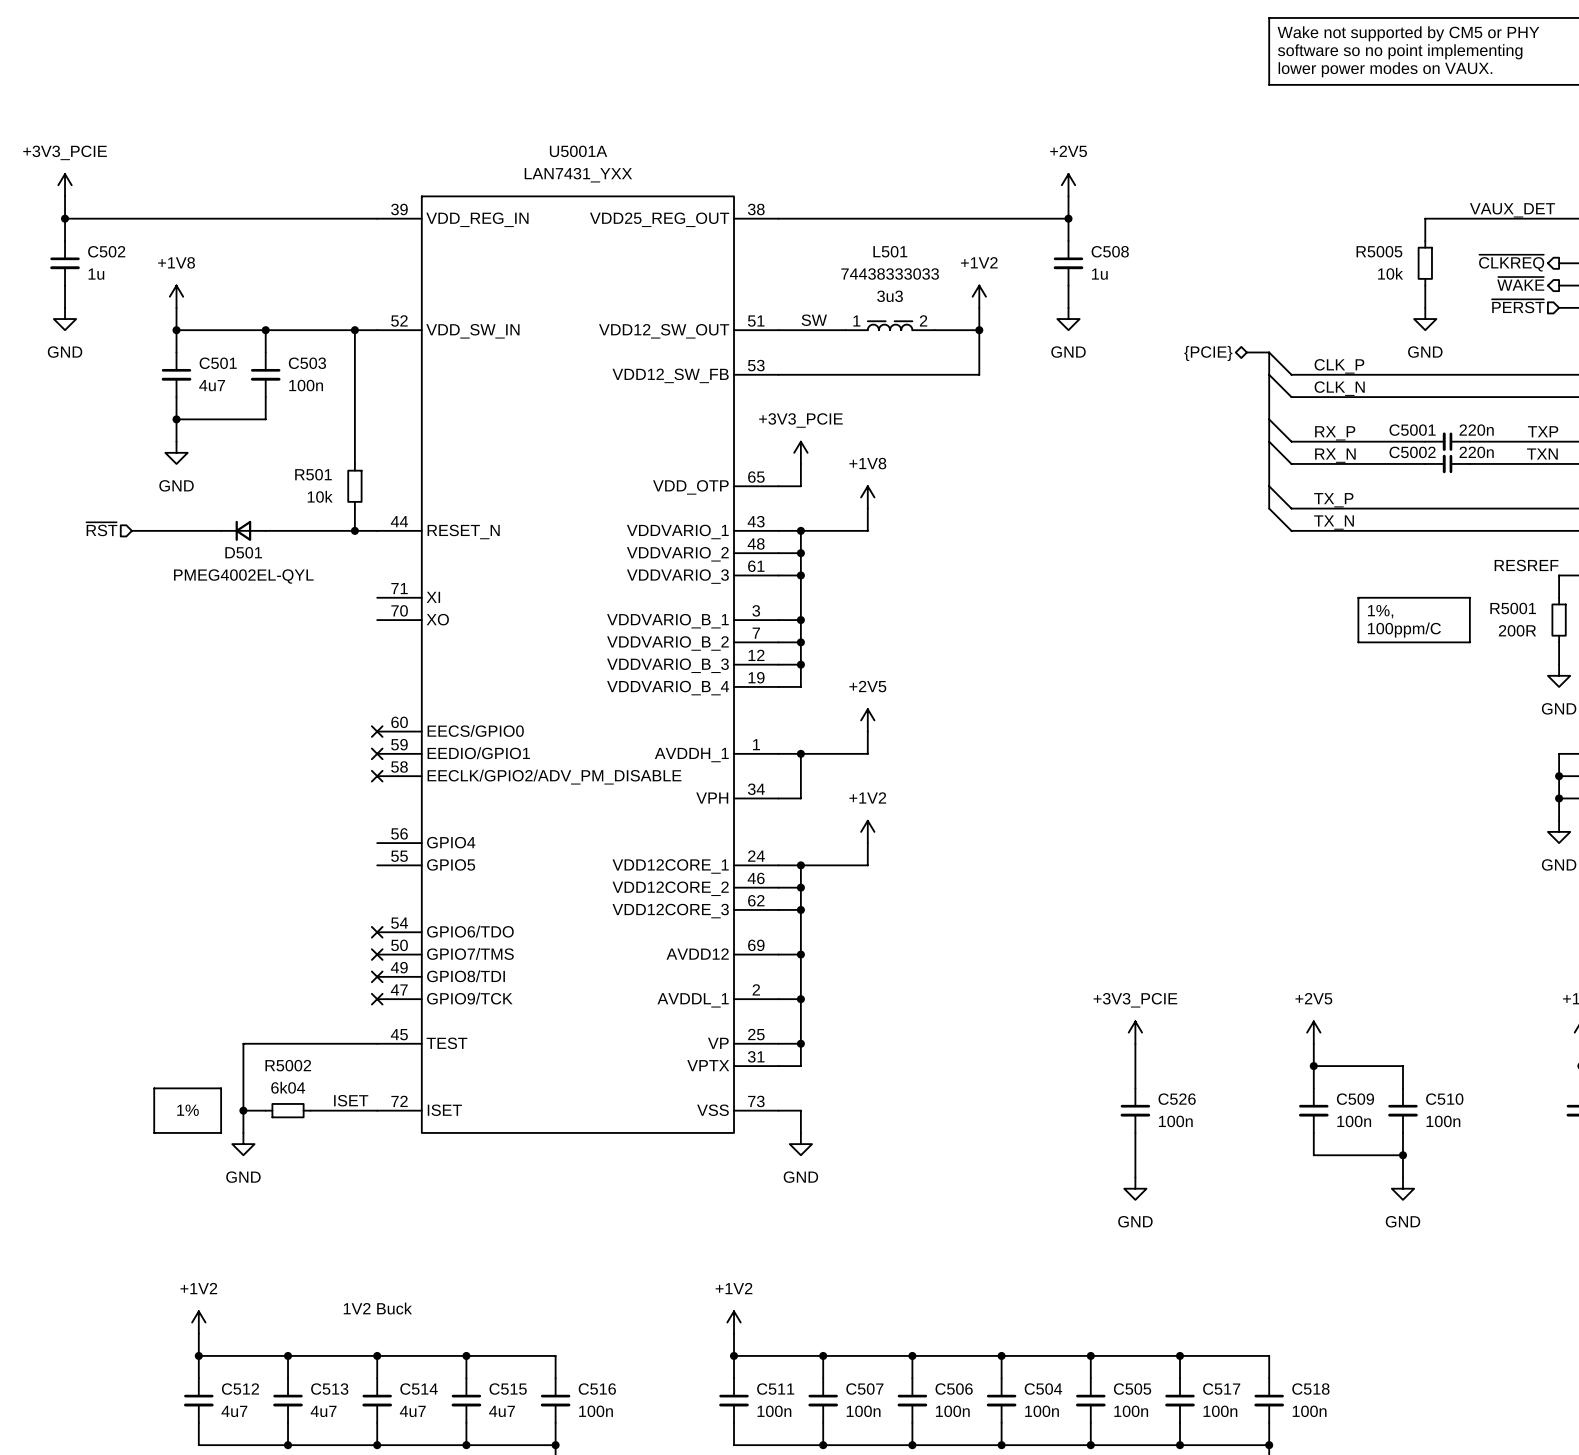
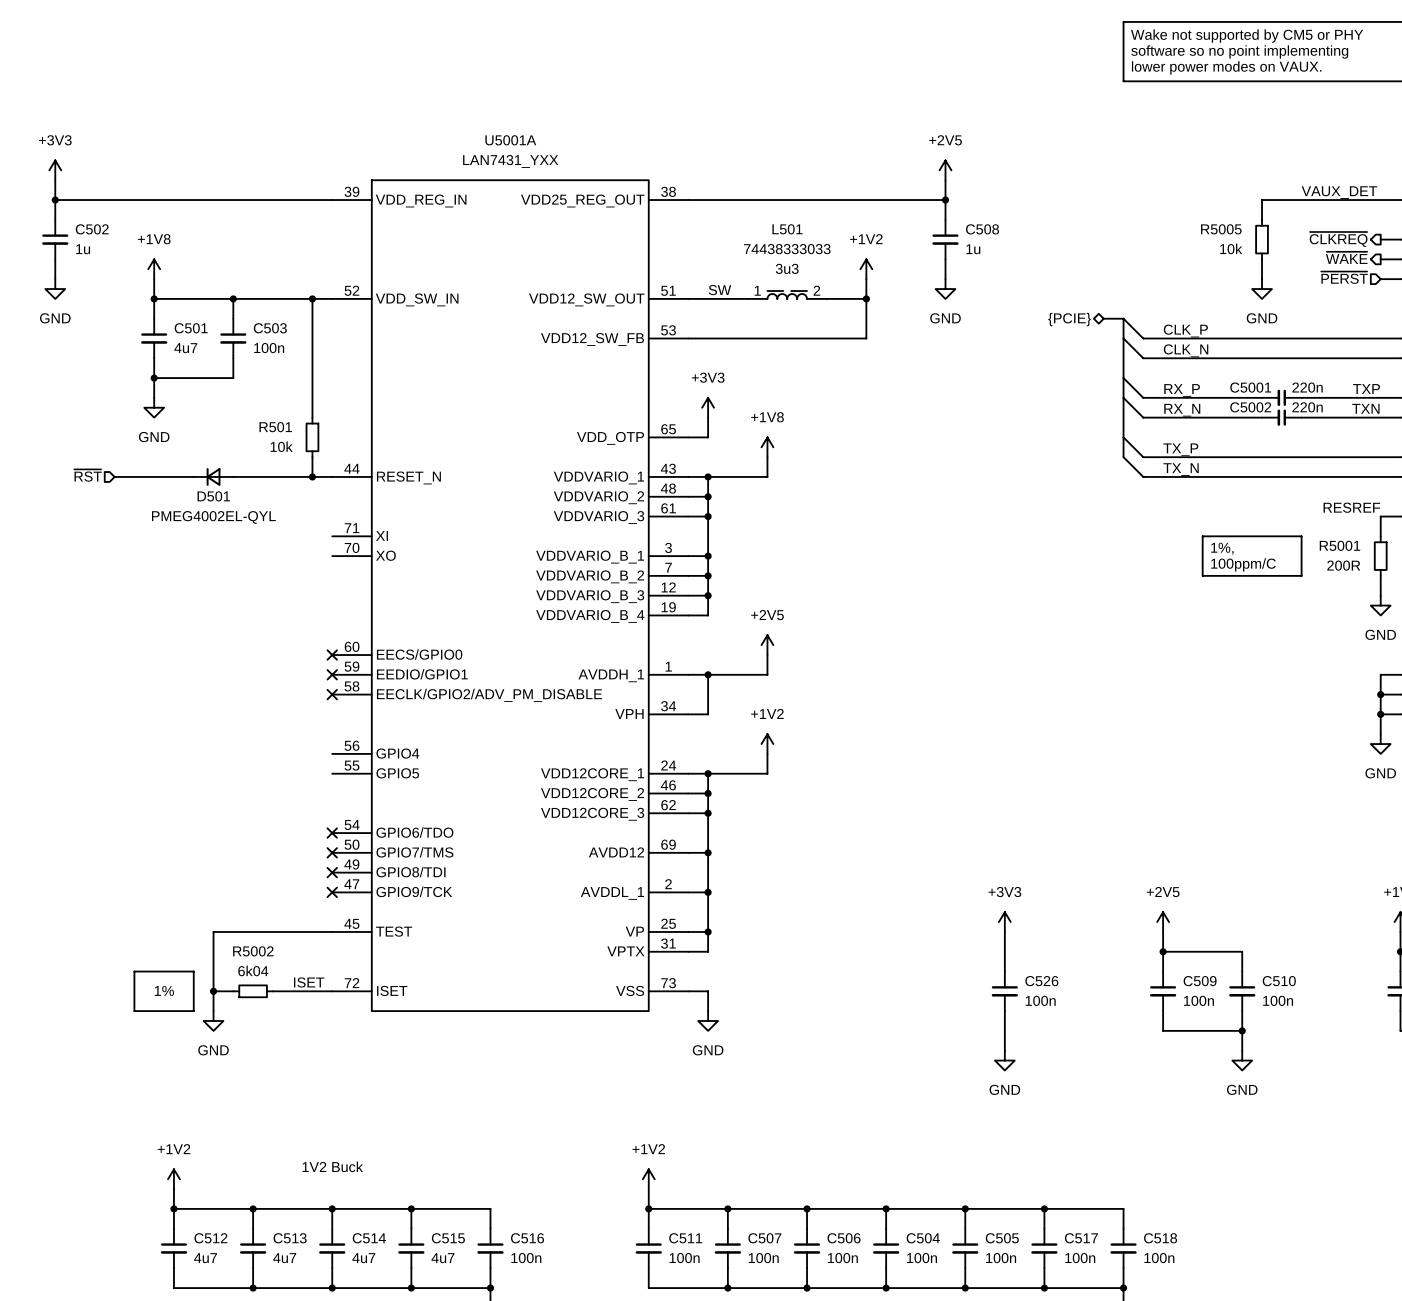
power symbol: +3V3_PCIE (65, 185) -> +3V3 (55, 170)
power symbol: +3V3_PCIE (800, 452) -> +3V3 (708, 407)
power symbol: +3V3_PCIE (1135, 1032) -> +3V3 (1004, 922)

